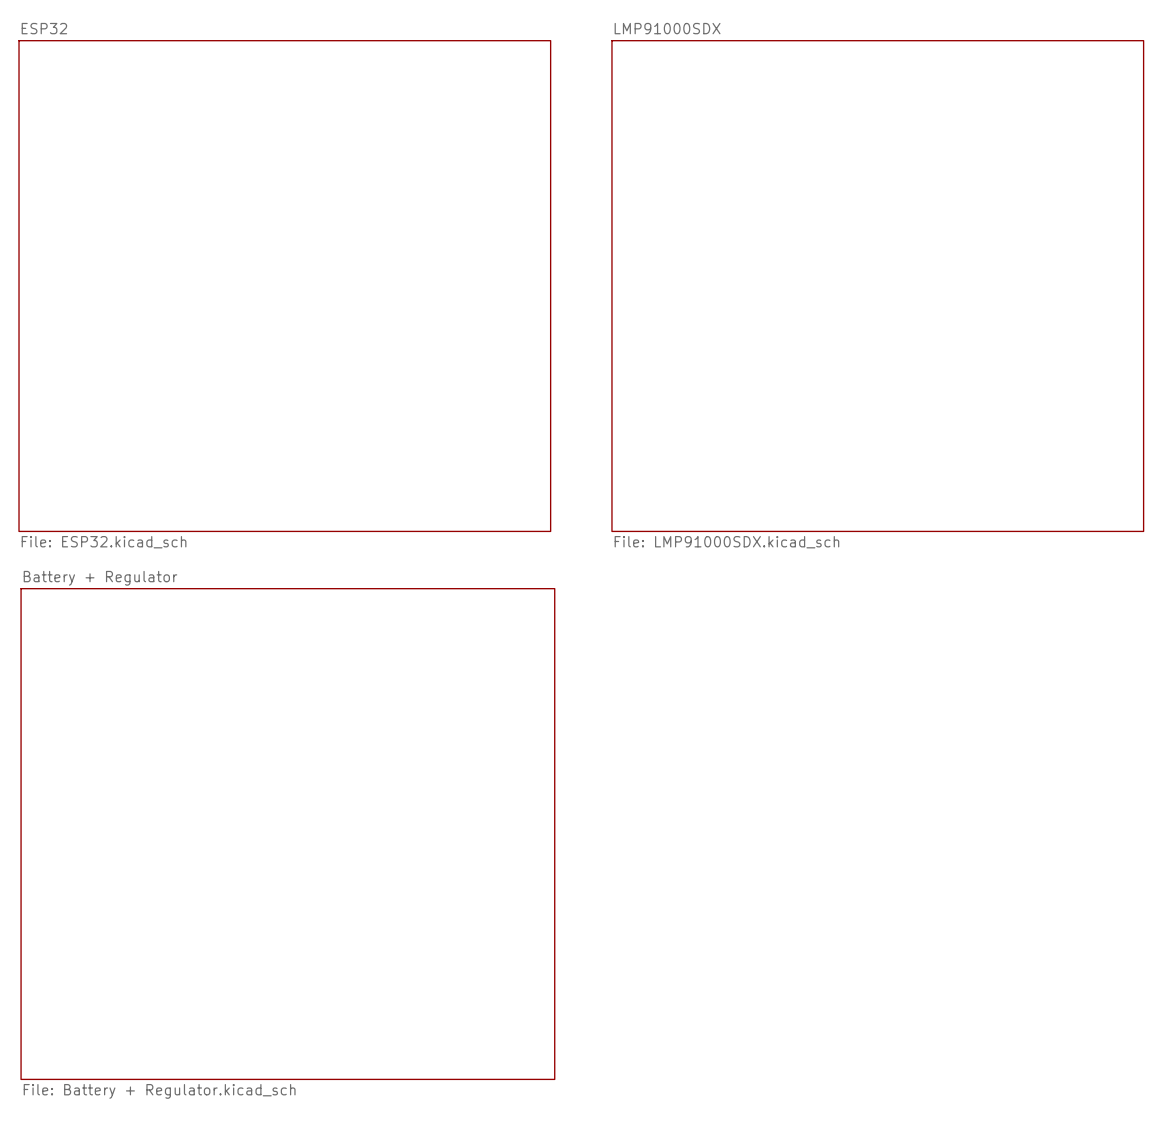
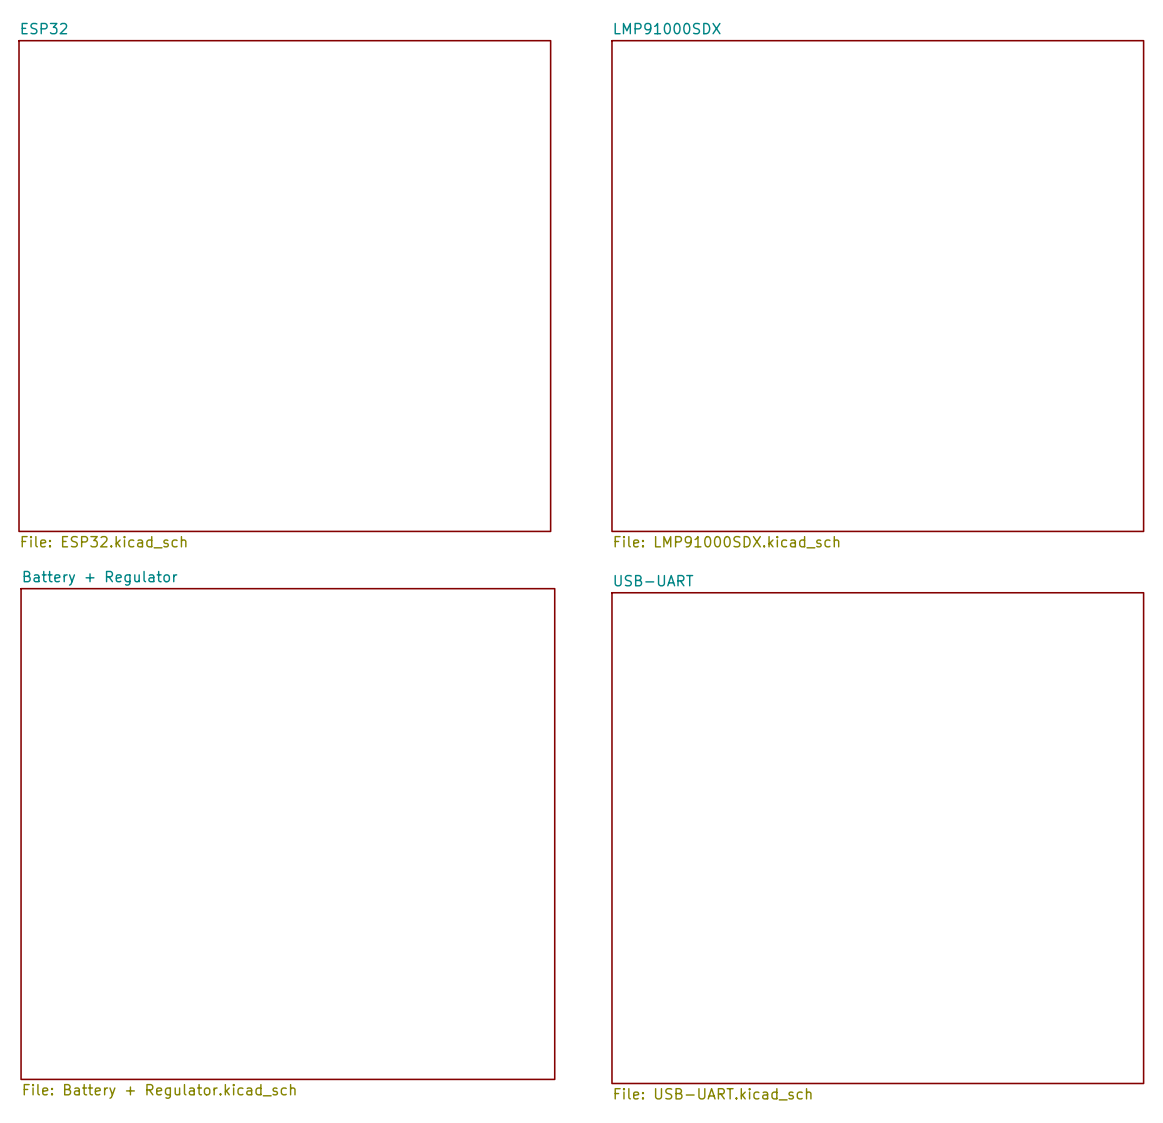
sheet USB-UART: none -> File: USB-UART.kicad_sch (877, 838)

